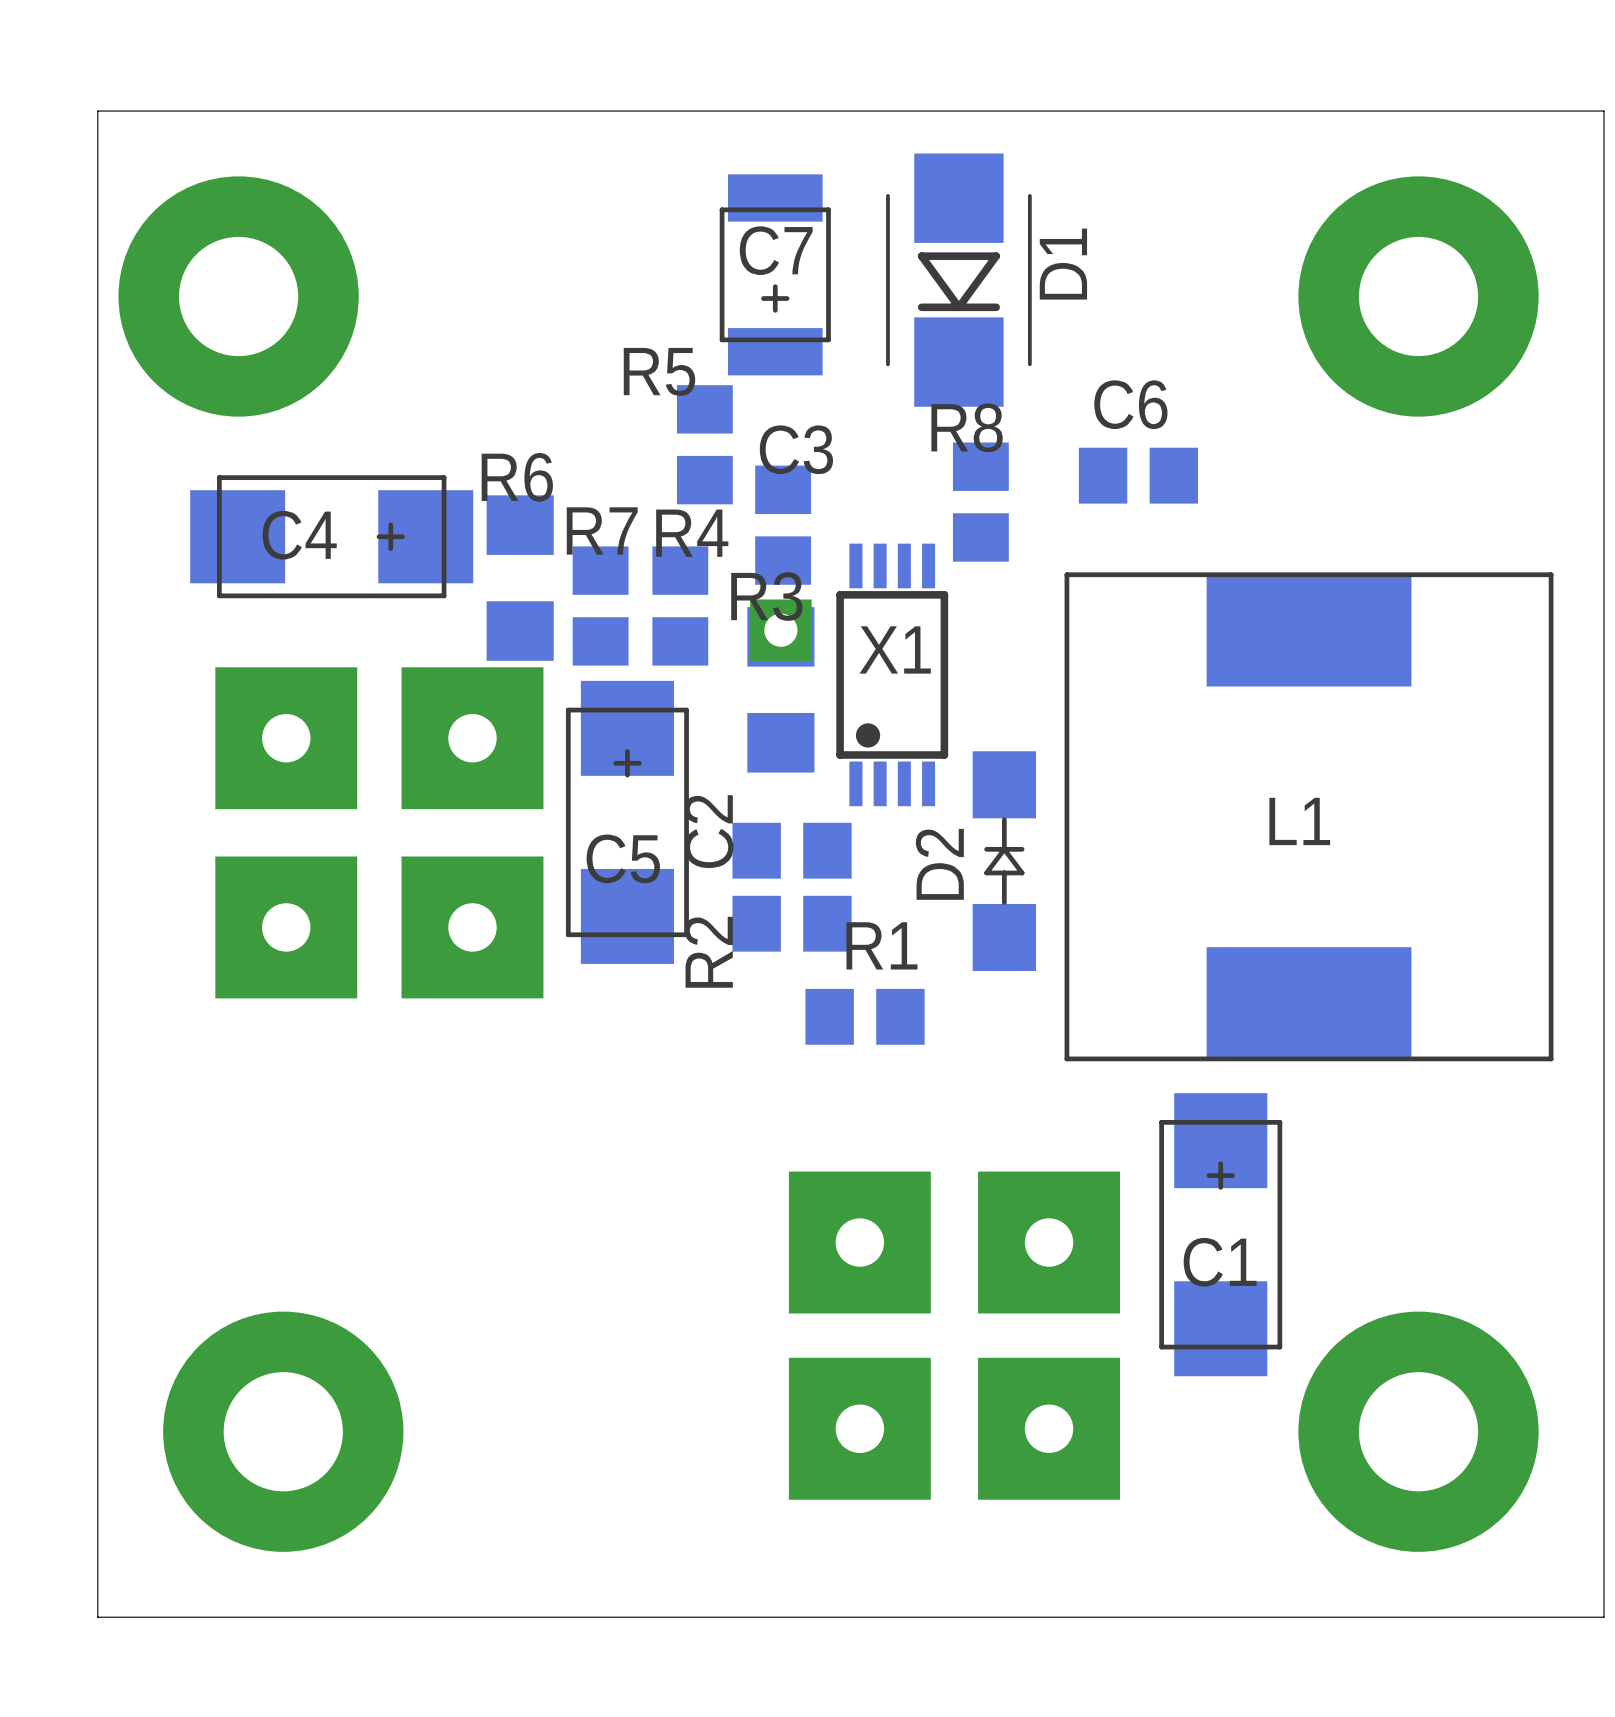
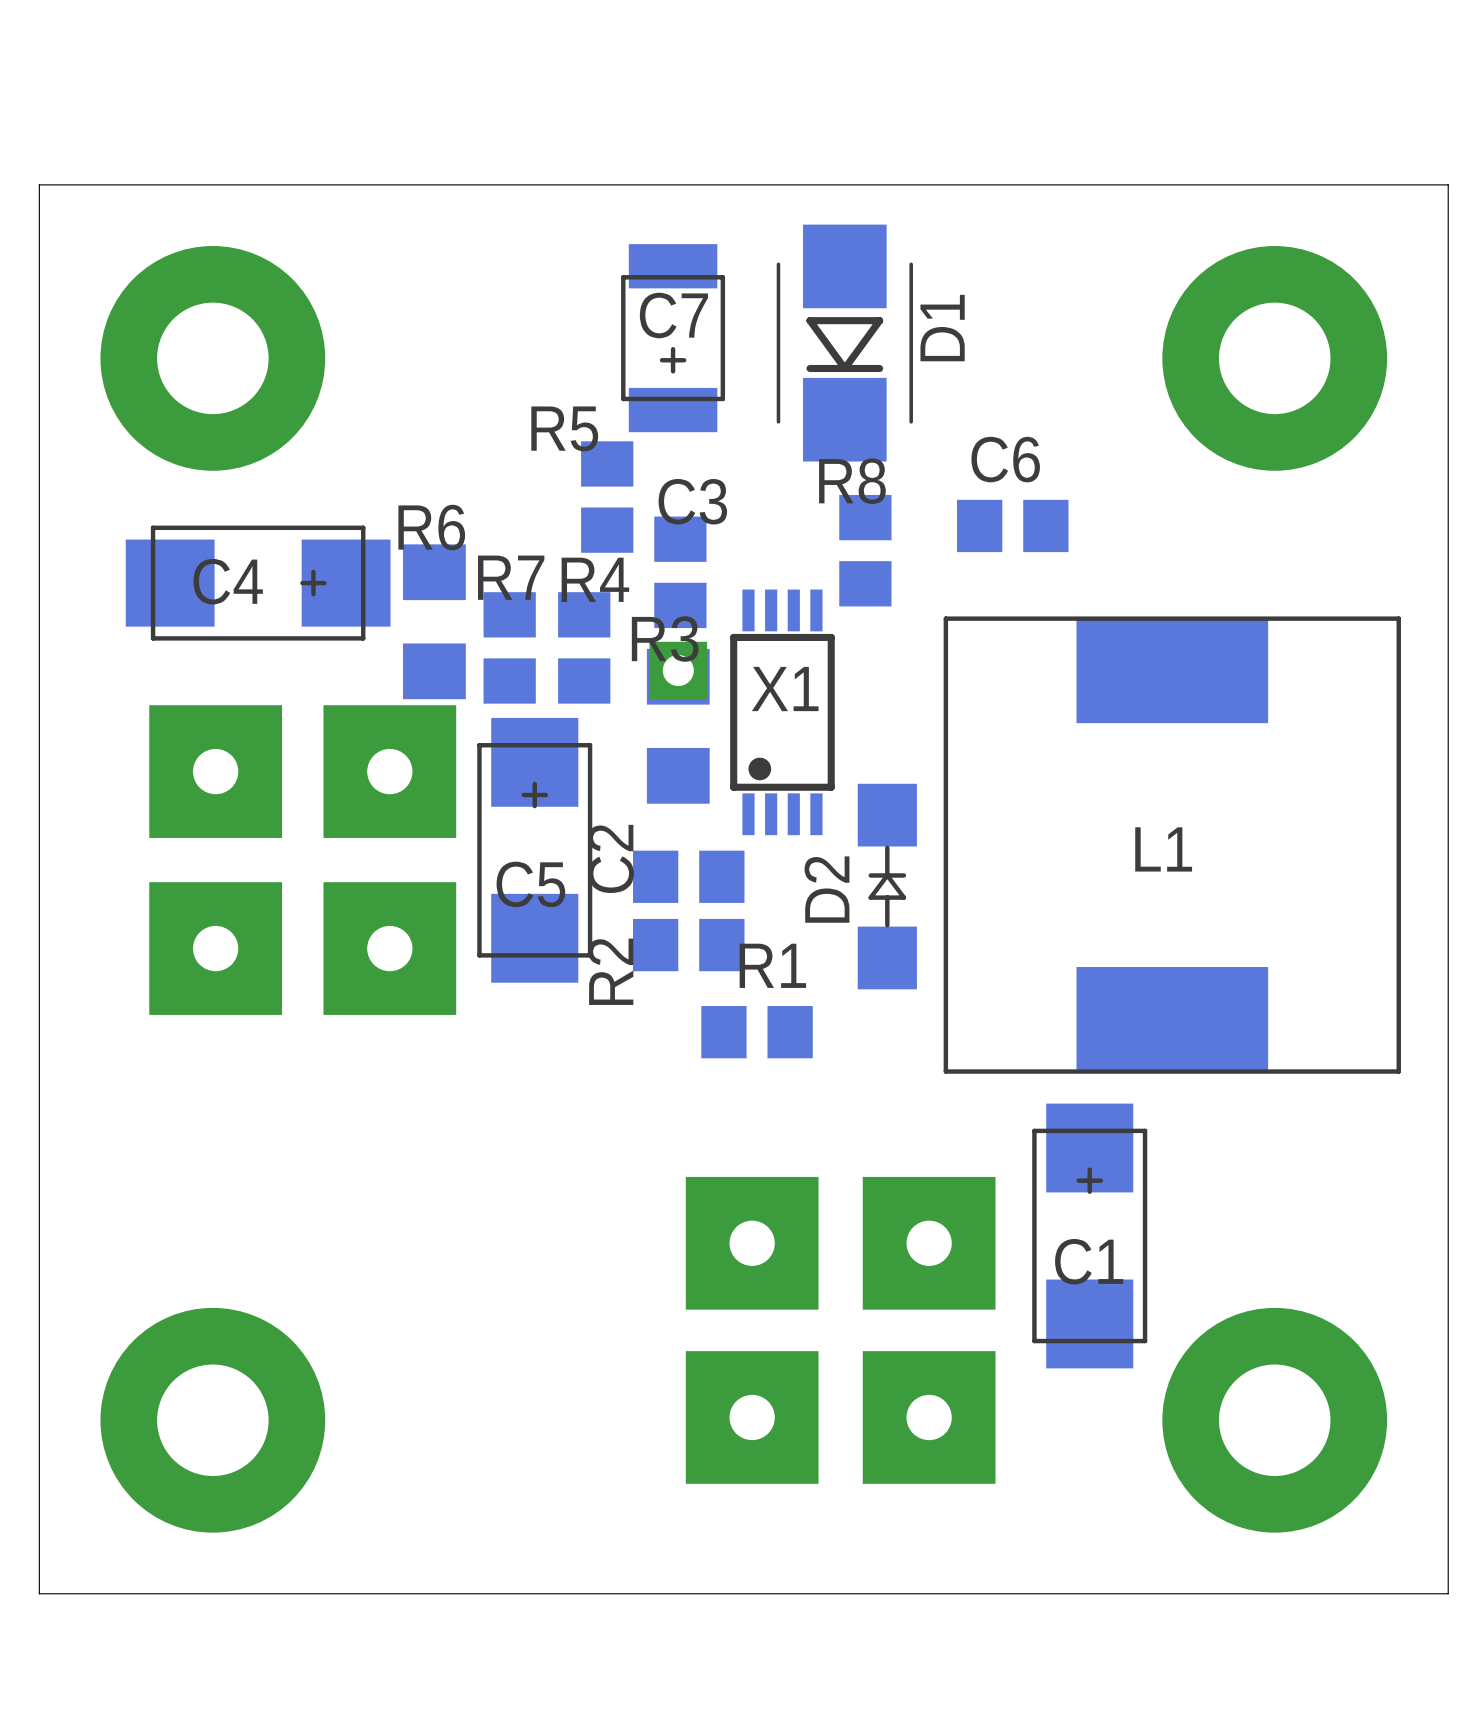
part position: (238, 296) -> (212, 358)

